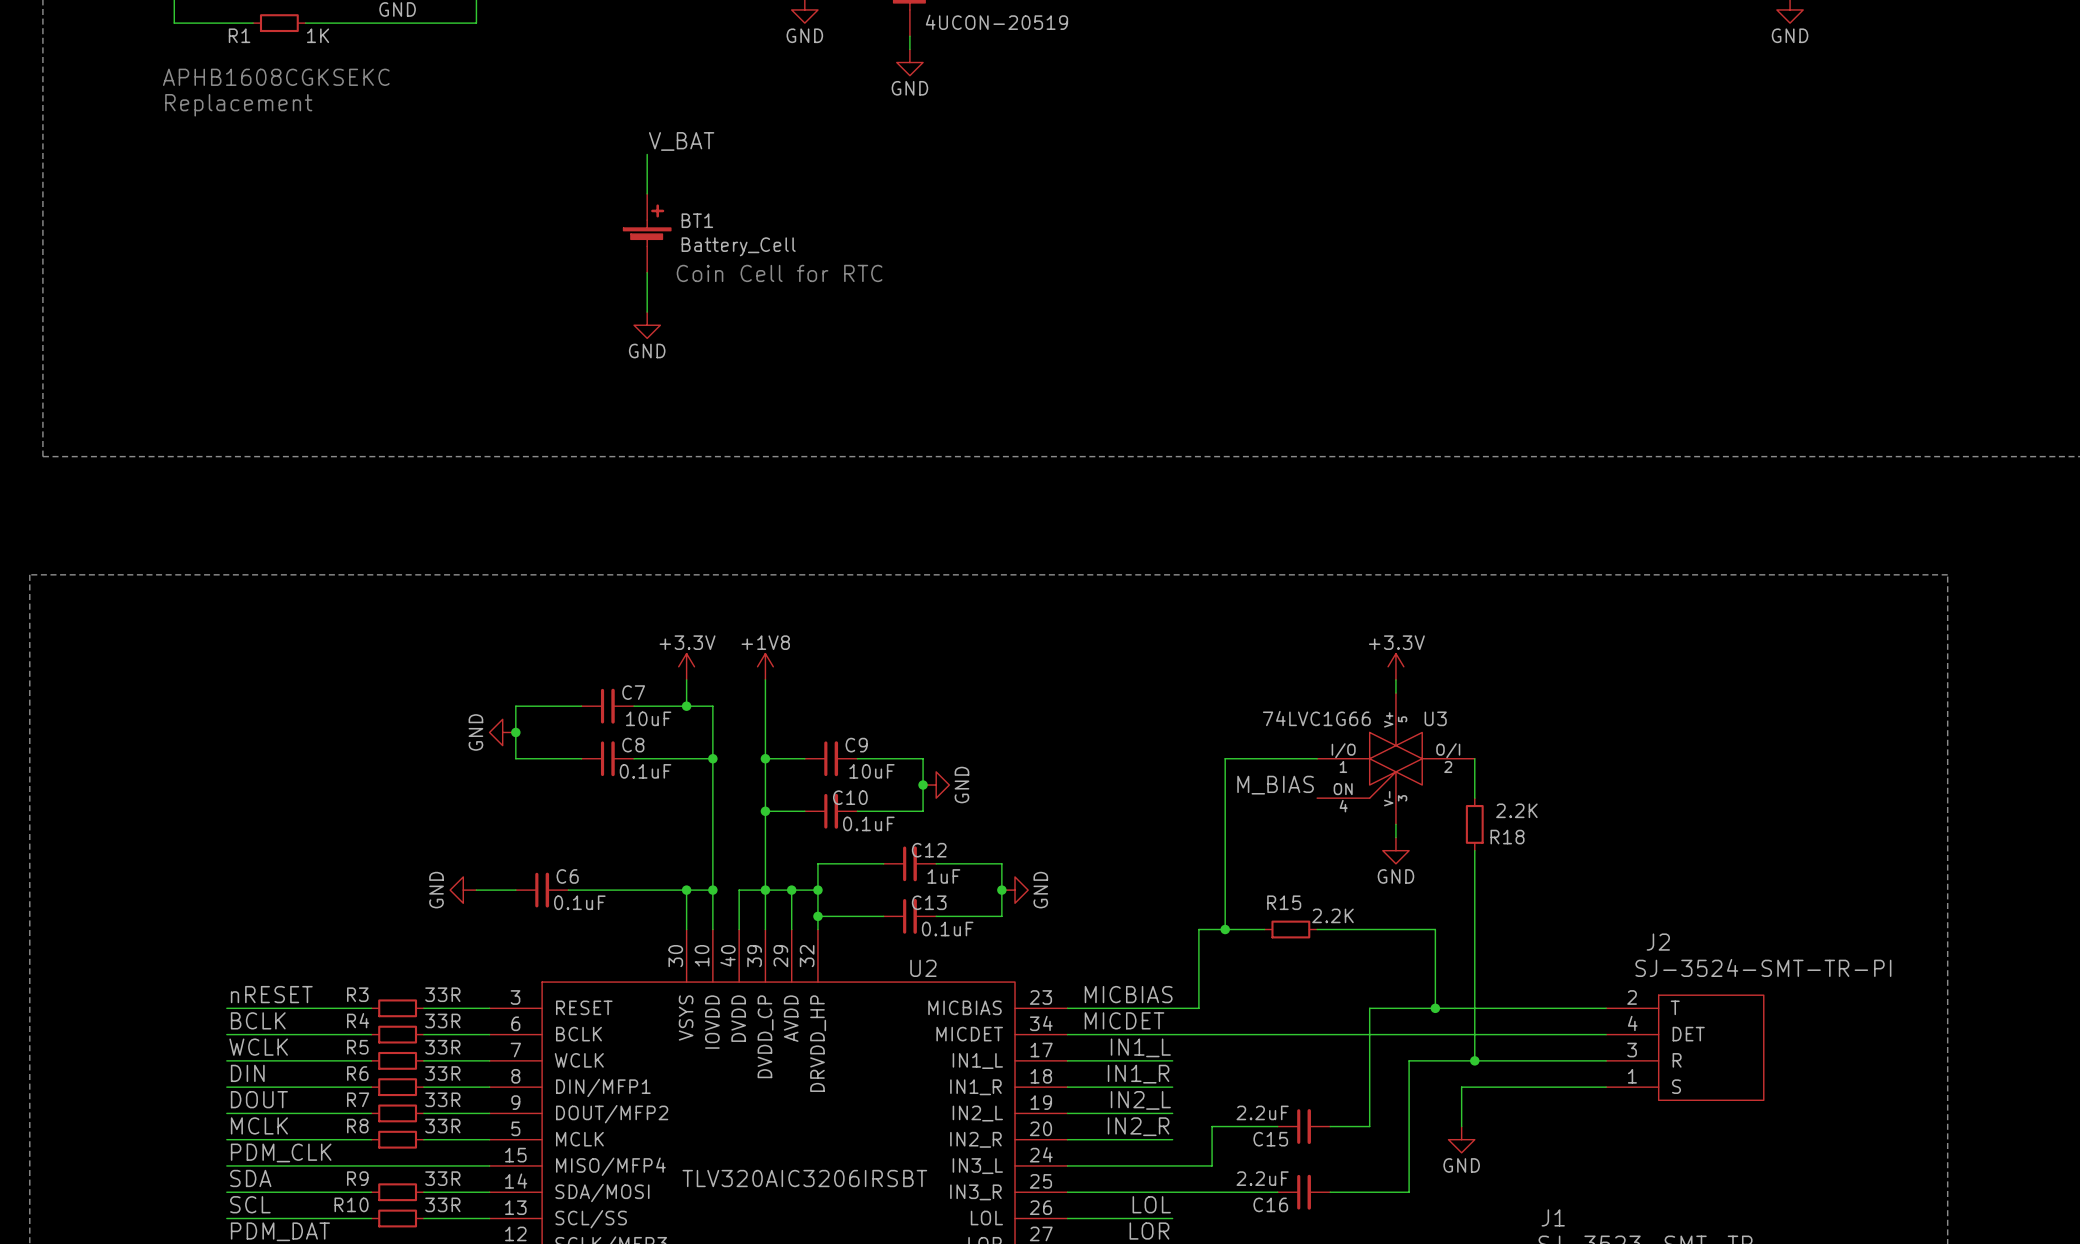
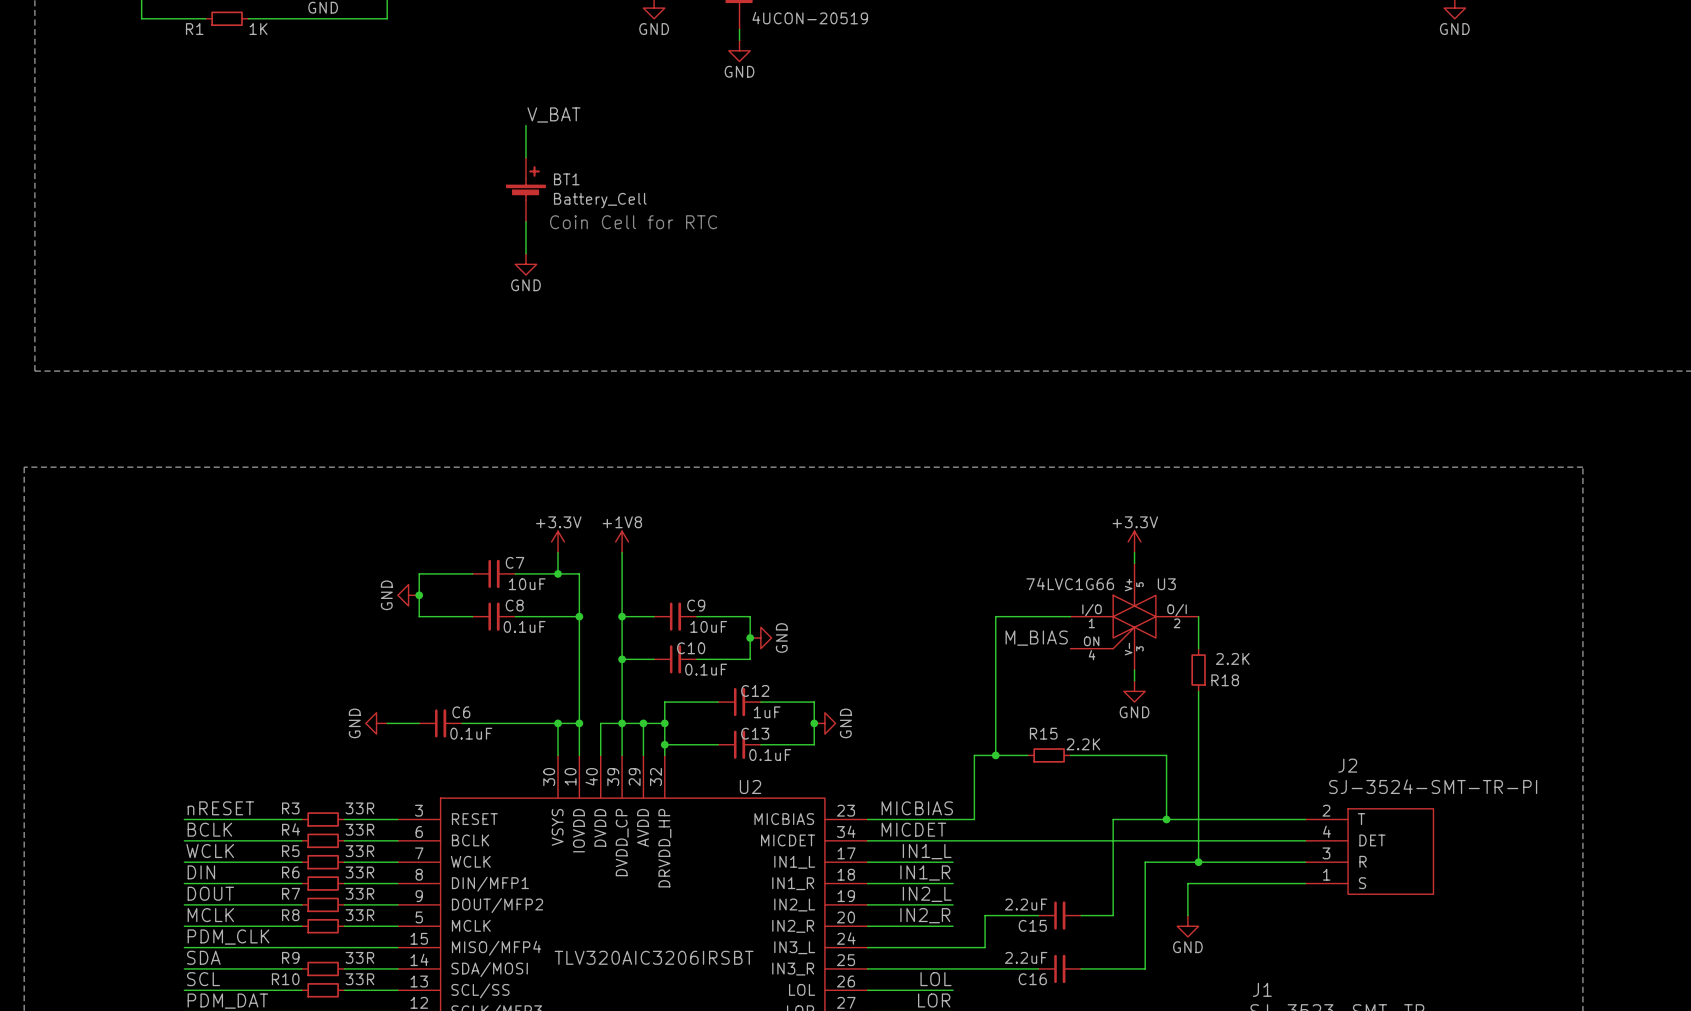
text: APHB1608CGKSEKC (276, 77) -> none
text: Replacement (238, 105) -> none

